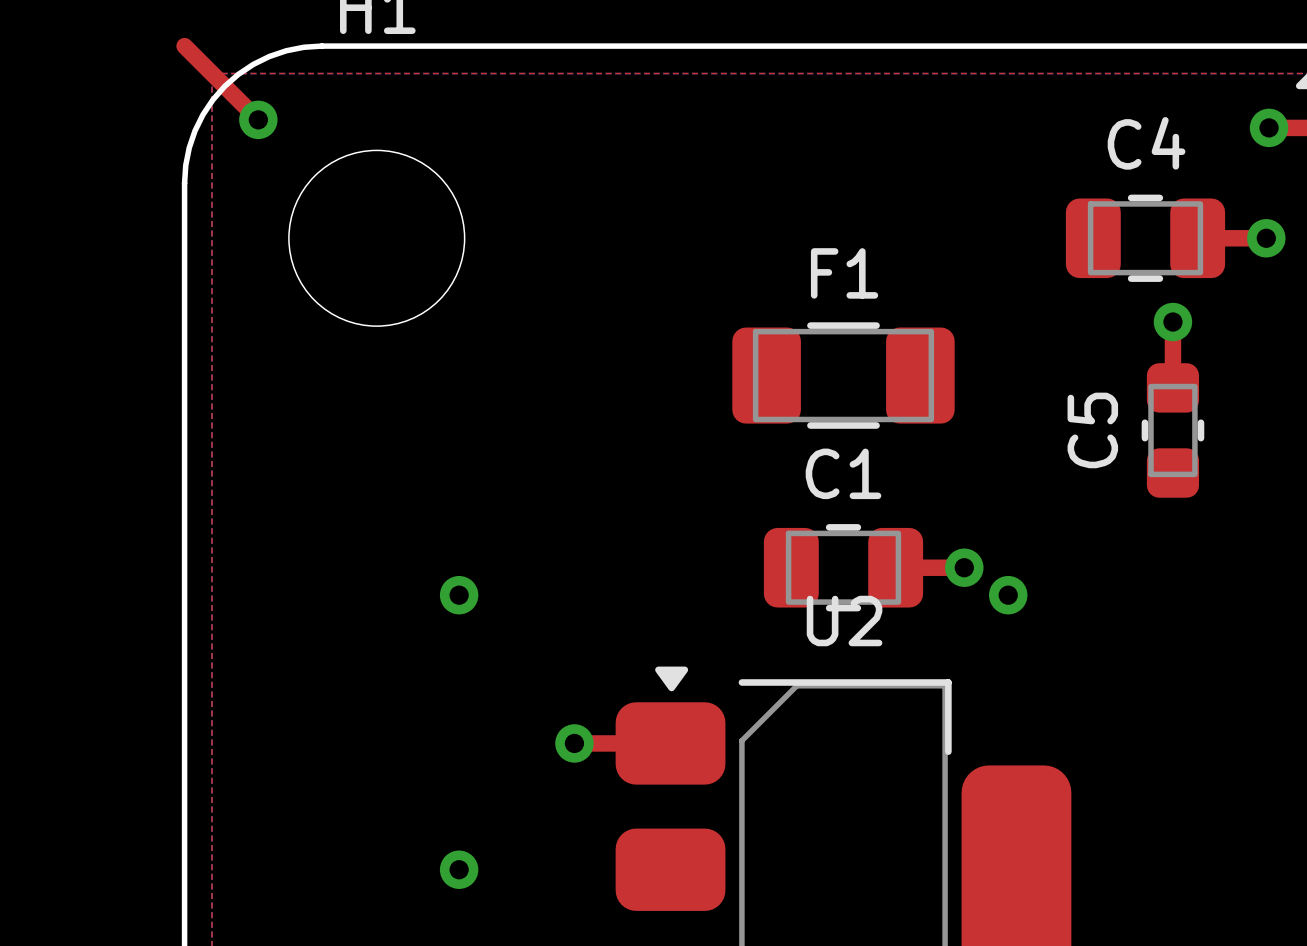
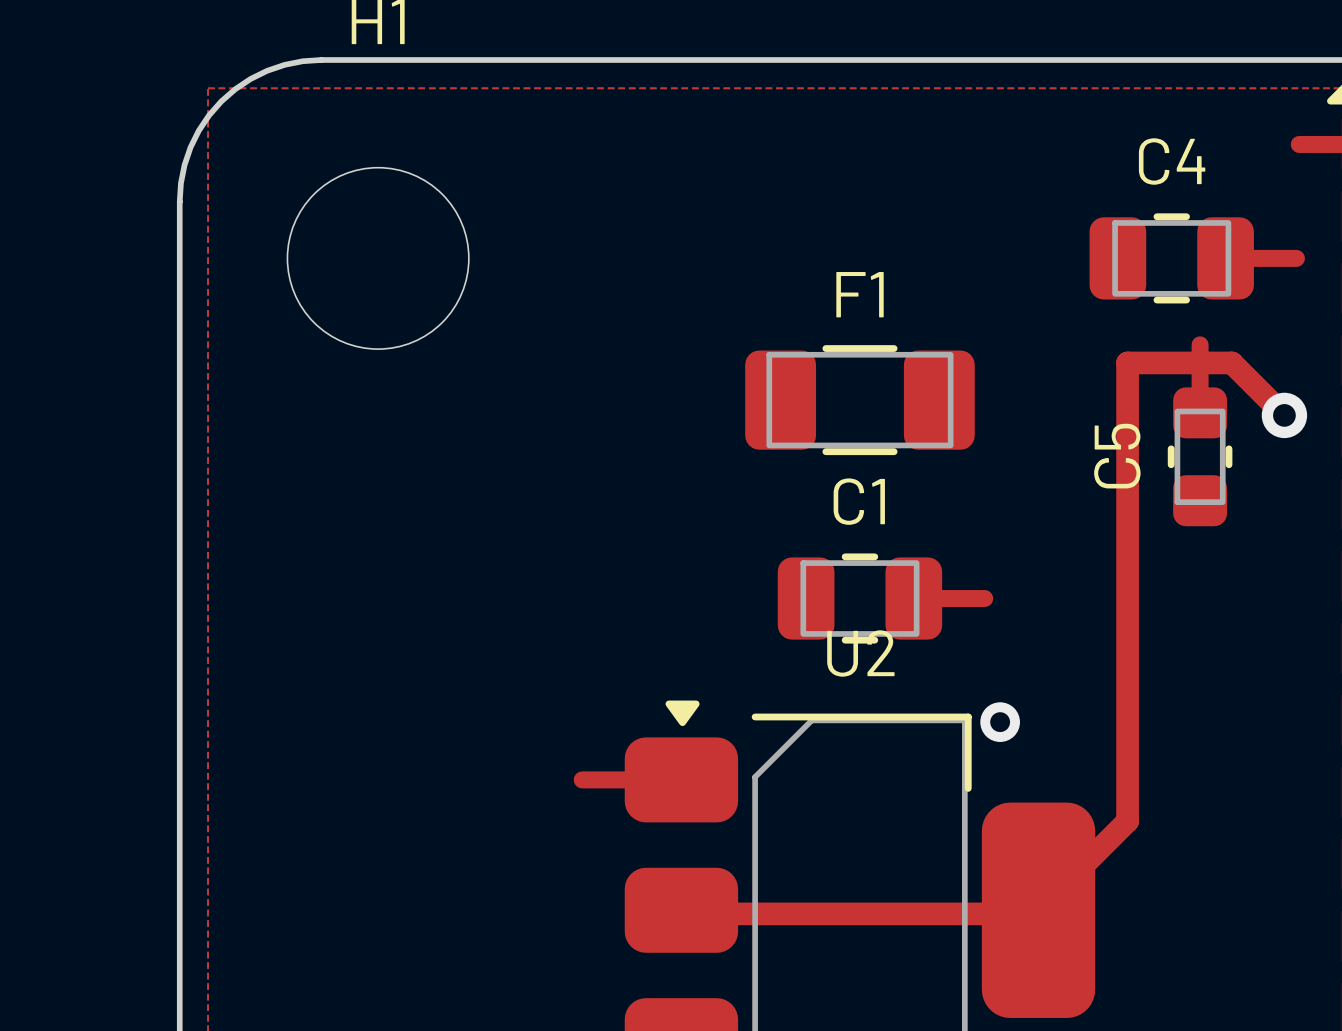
top track: (184, 46) (258, 119) -> none
via: (258, 119) -> none
via: (1269, 127) -> none
via: (1266, 238) -> none
via: (1172, 322) -> none
top track: none -> (1284, 415) (1231, 362) (1127, 362) (1127, 821) (1034, 913) (685, 913) (681, 910)
via: none -> (1284, 415)
via: (964, 567) -> none
via: (459, 595) -> none
via: (1008, 595) -> none
via: none -> (1000, 722)
via: (574, 743) -> none
via: (459, 869) -> none

